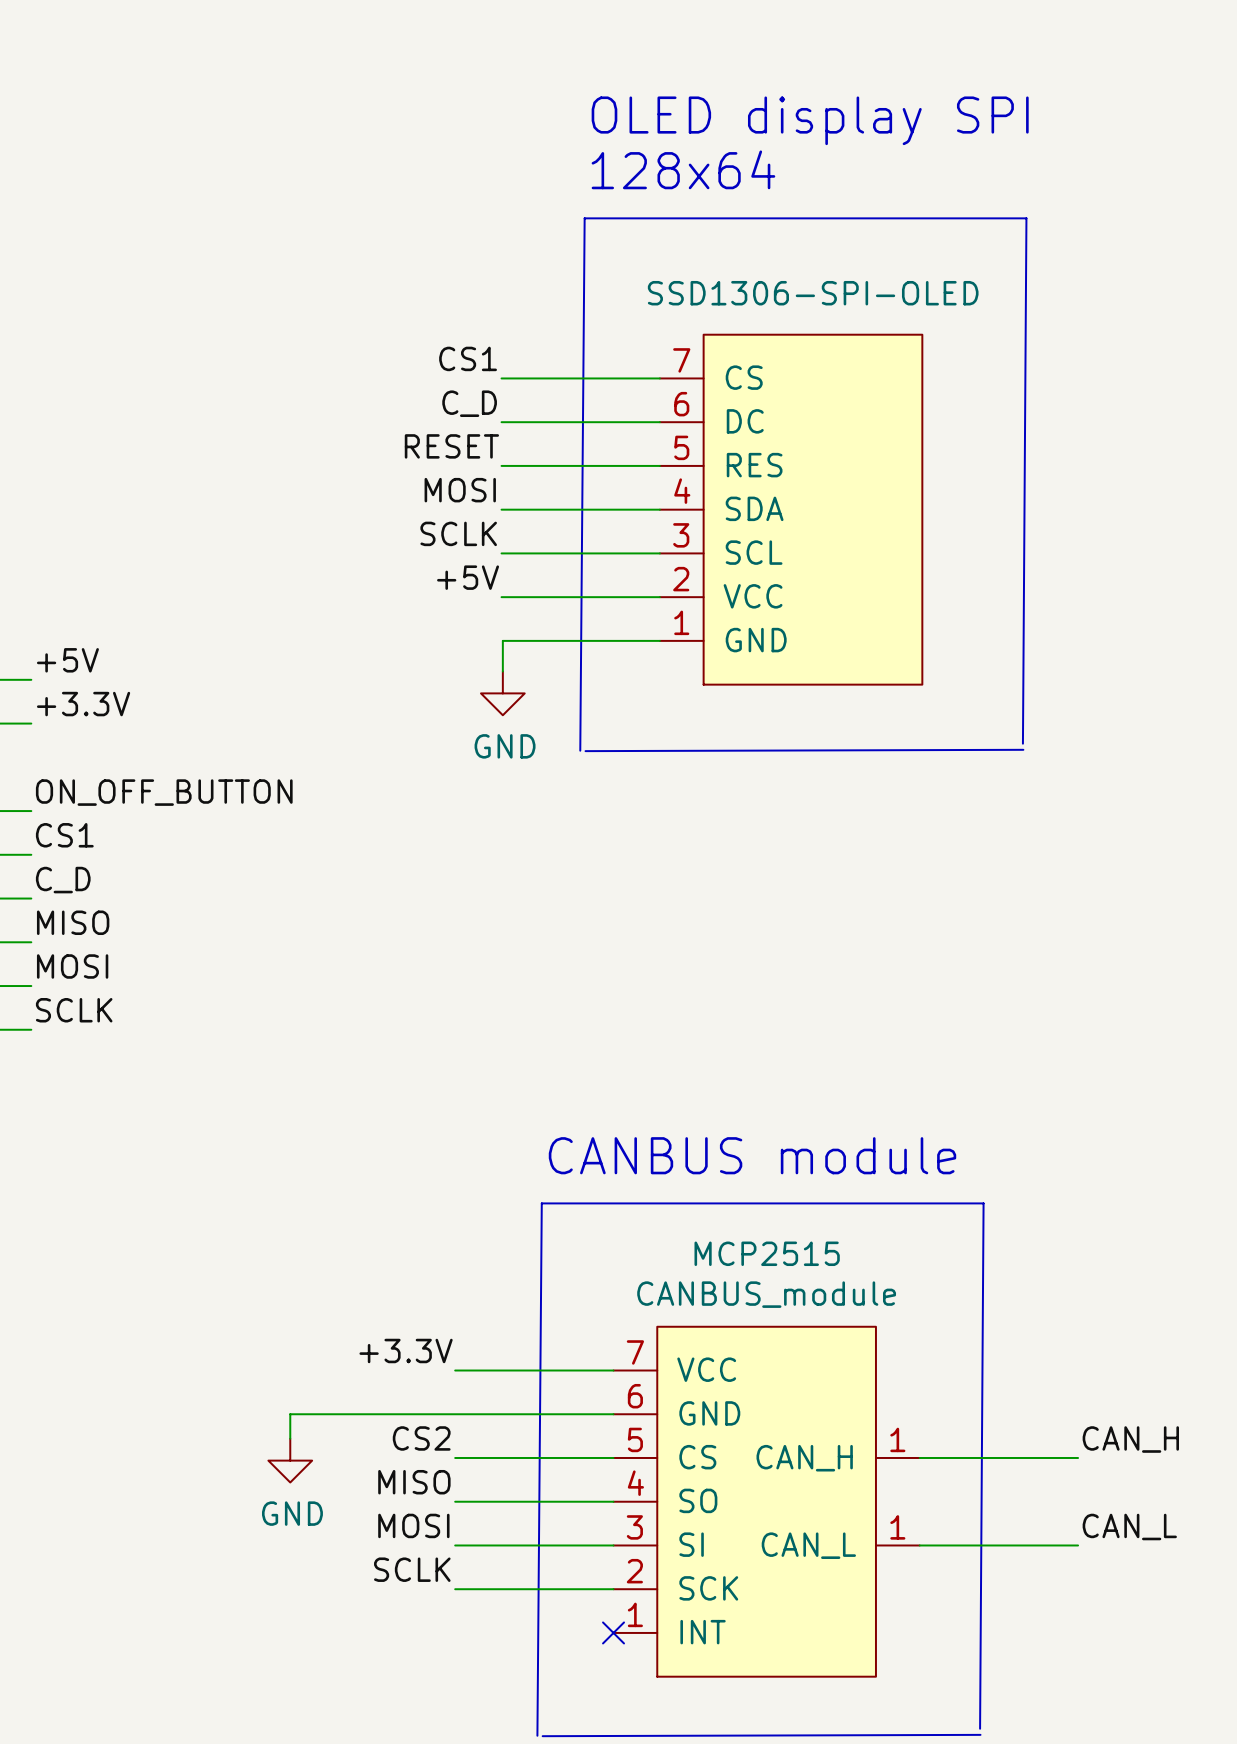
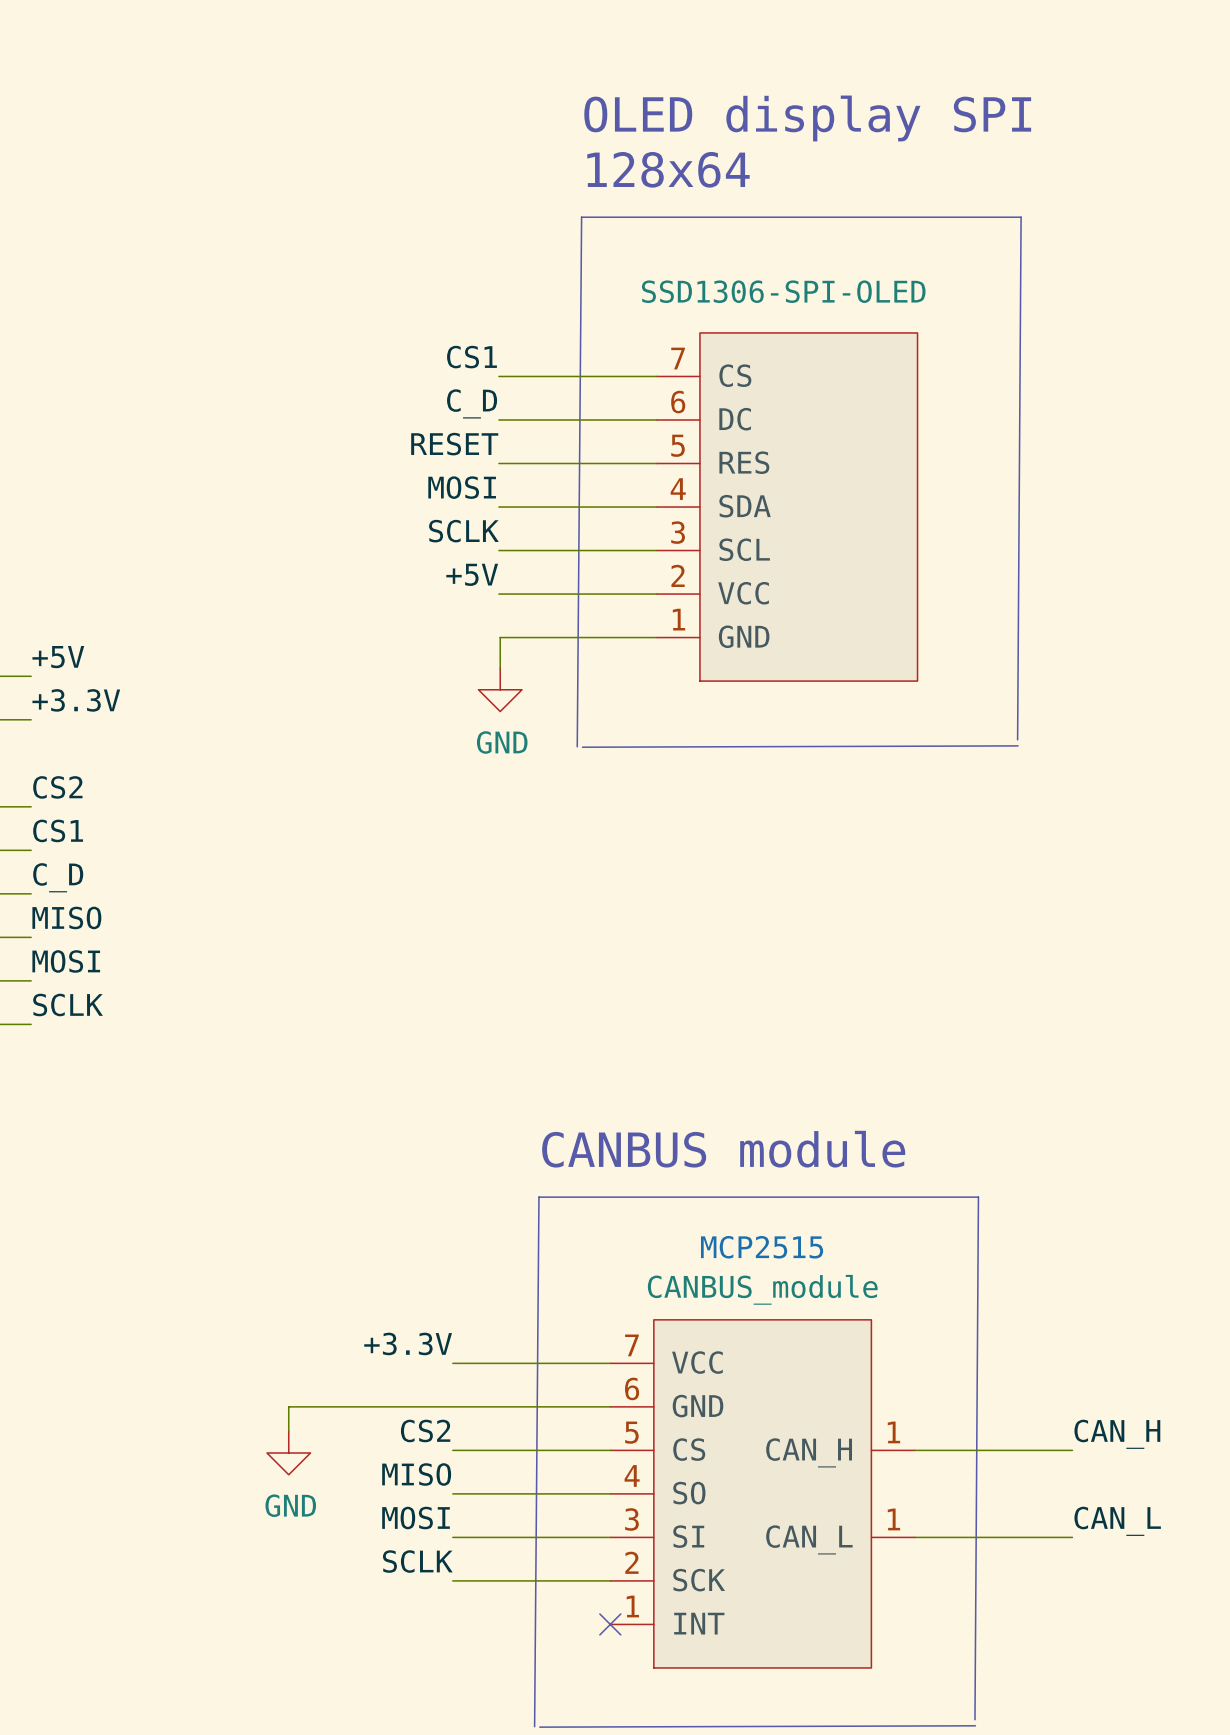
label: ON_OFF_BUTTON (164, 792) -> CS2 (57, 787)

